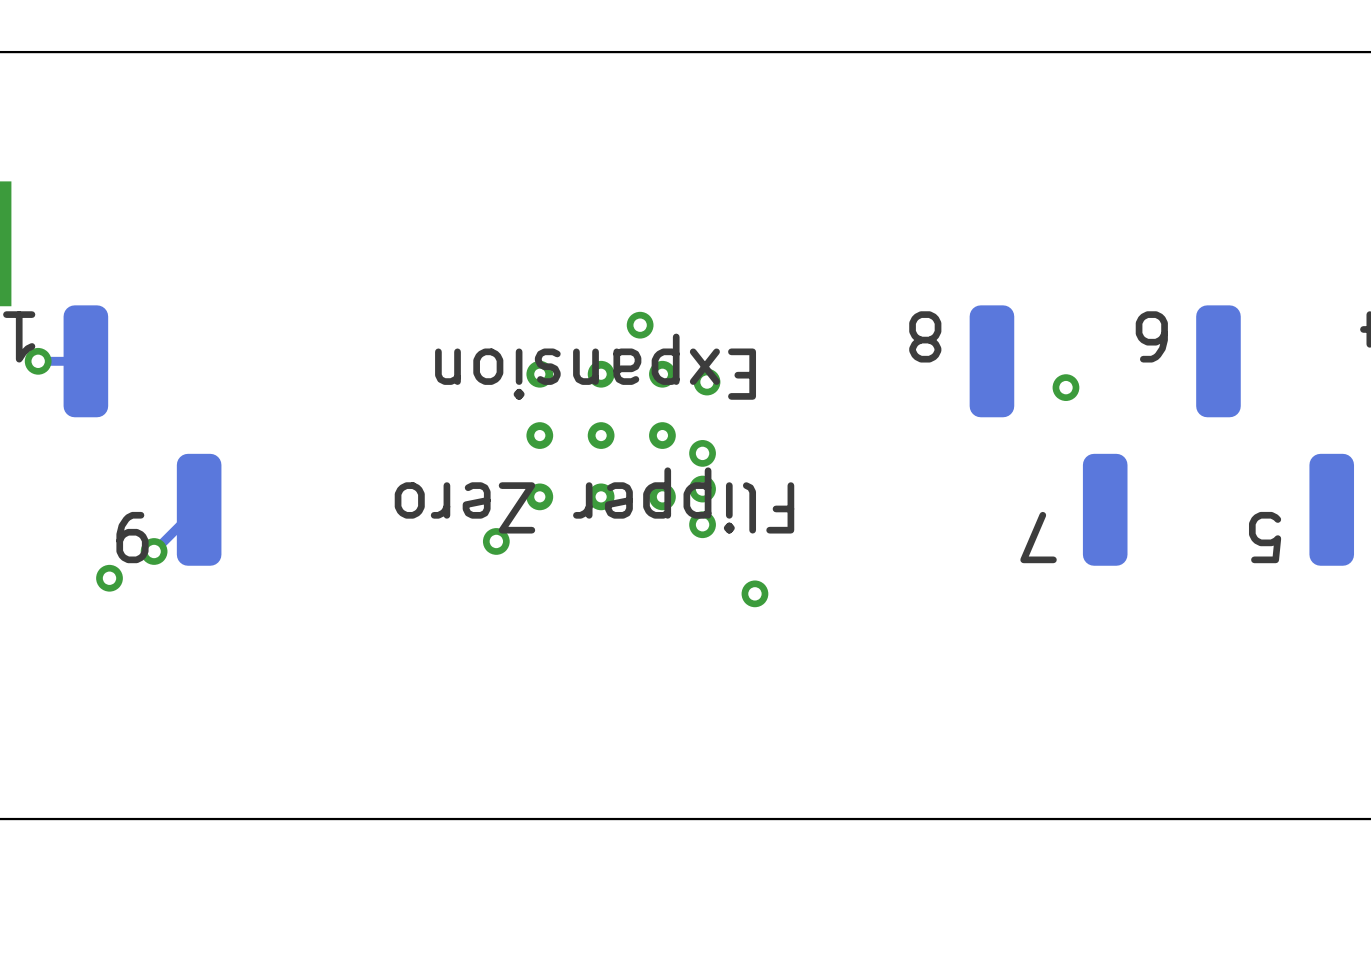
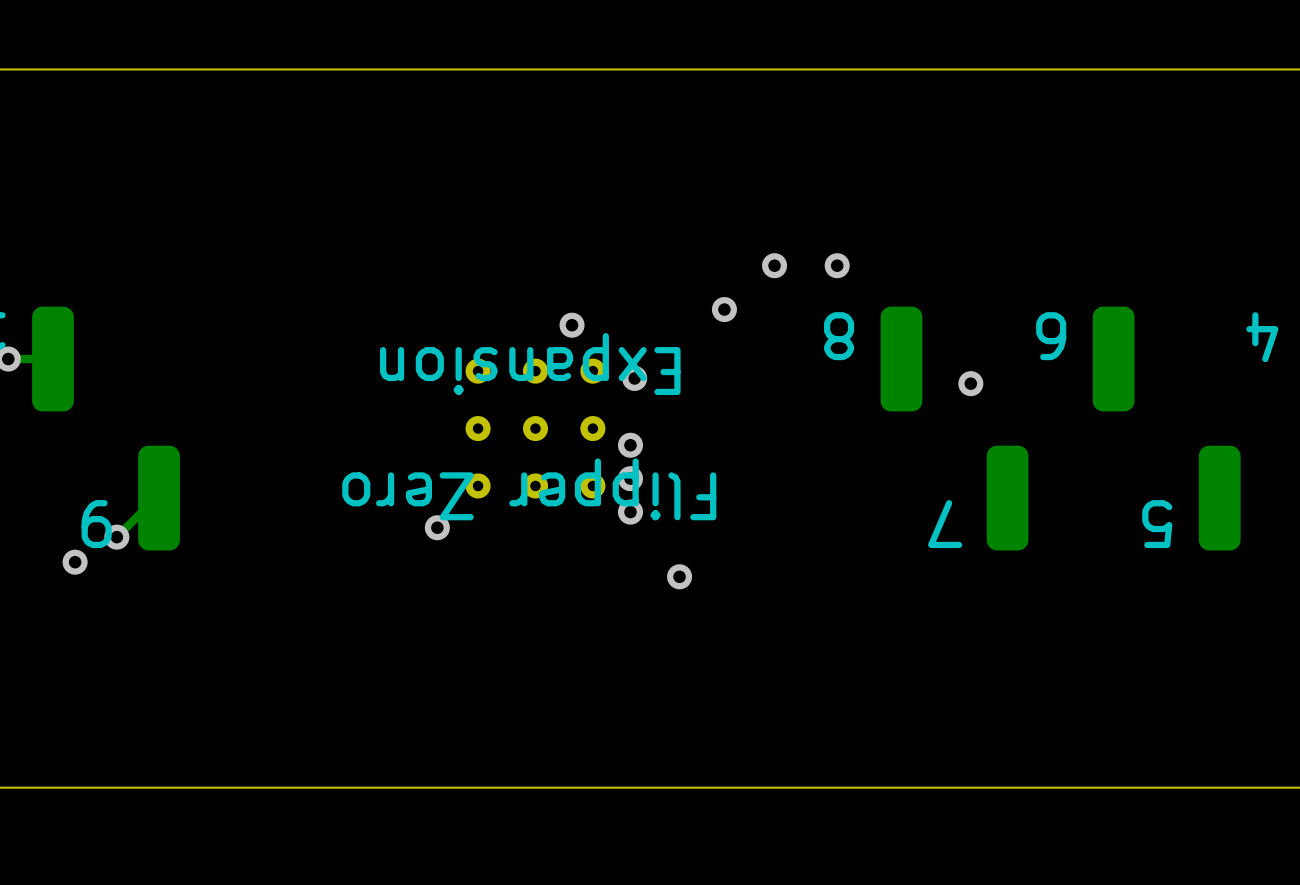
via: none -> (774, 265)
via: none -> (837, 265)
via: none -> (724, 309)

